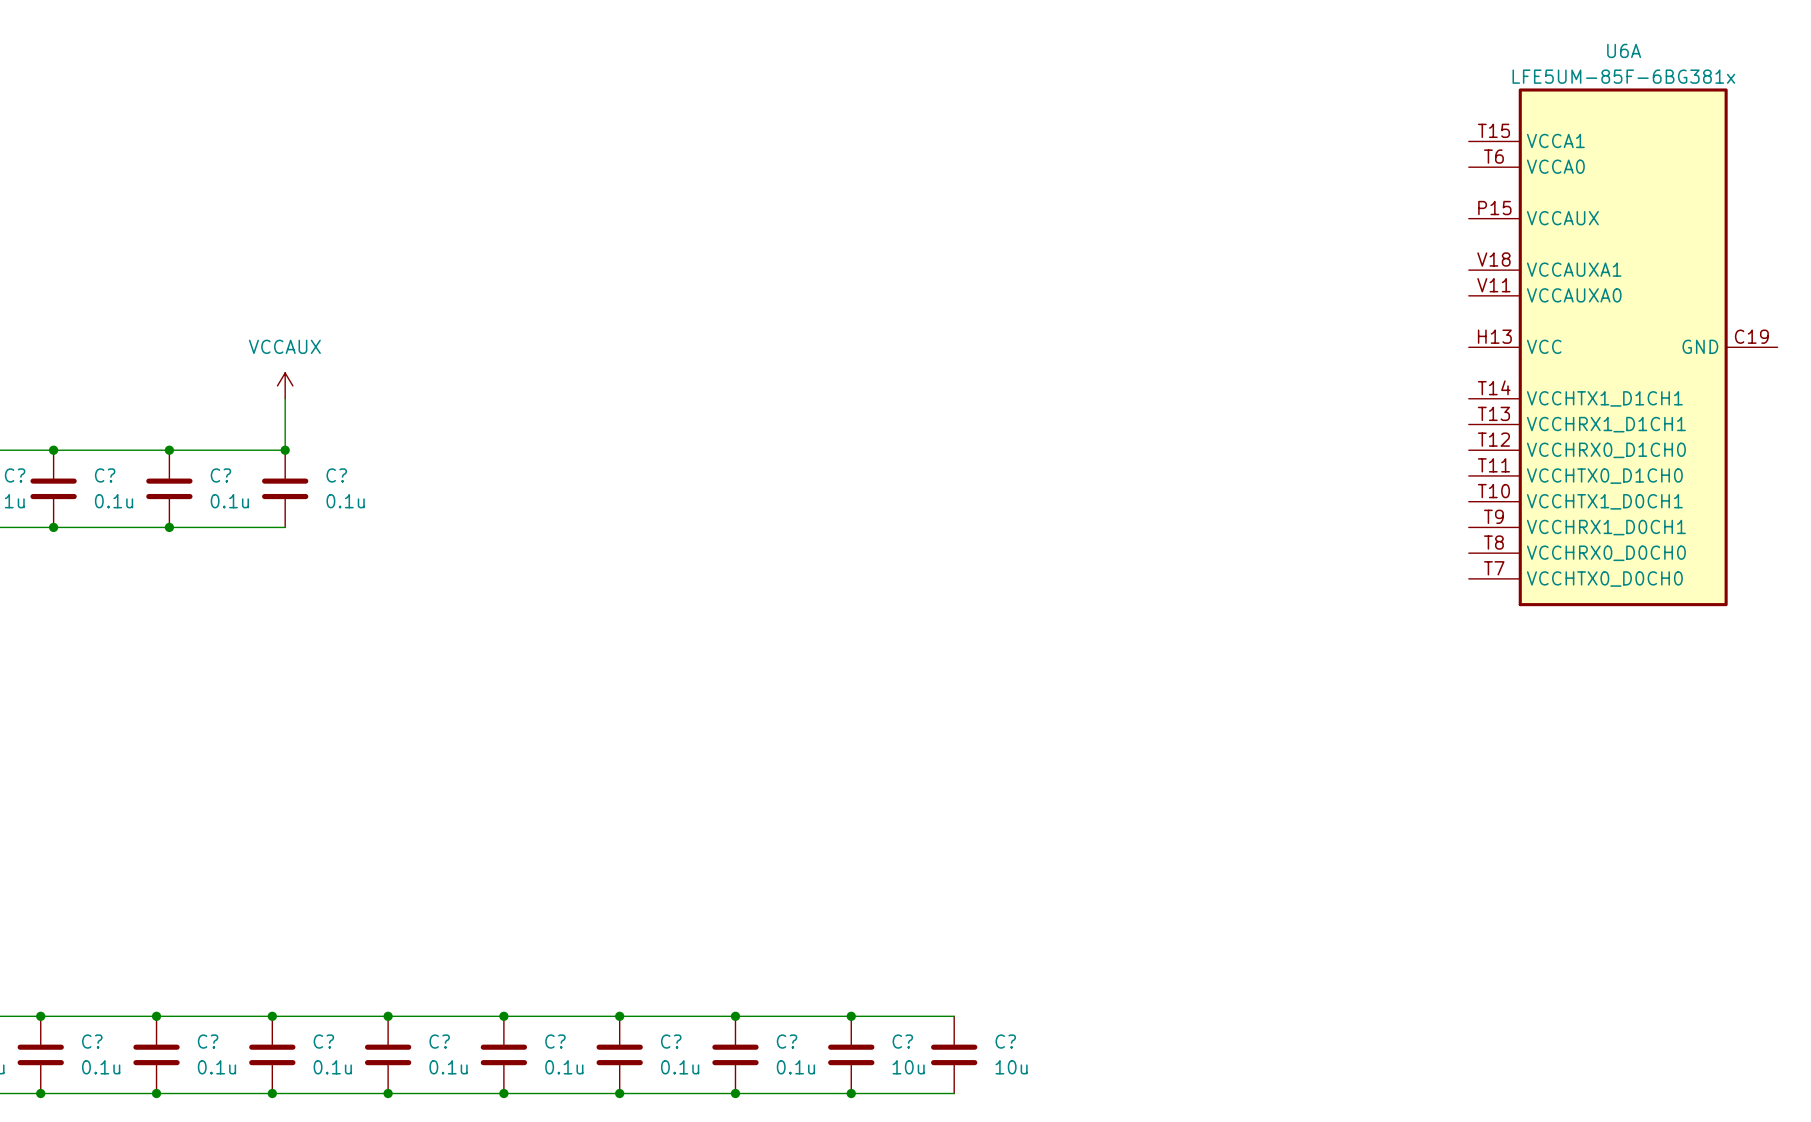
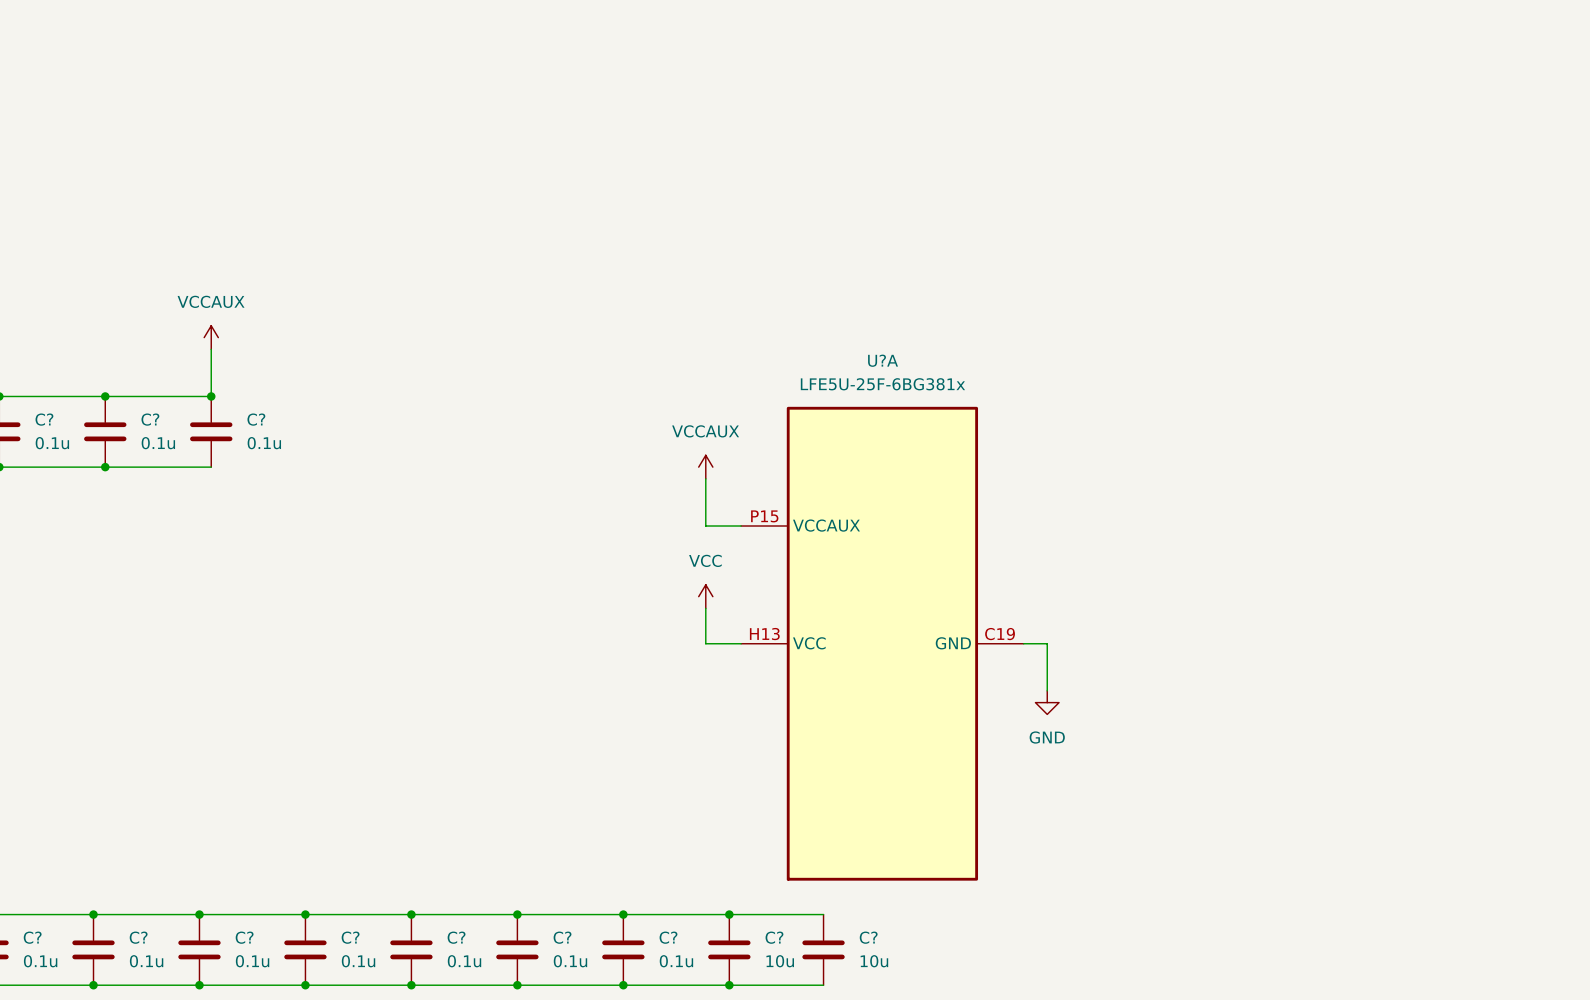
U6A: LFE5UM-85F-6BG381x (1623, 347) -> none
power symbol: none -> VCCAUX (705, 467)
wire: none -> (705, 478) (705, 526) (741, 526)
power symbol: none -> VCC (705, 596)
wire: none -> (705, 608) (705, 643) (741, 643)
U?A: none -> LFE5U-25F-6BG381x (882, 643)
wire: none -> (1023, 643) (1047, 643) (1047, 690)
power symbol: none -> GND (1047, 702)

